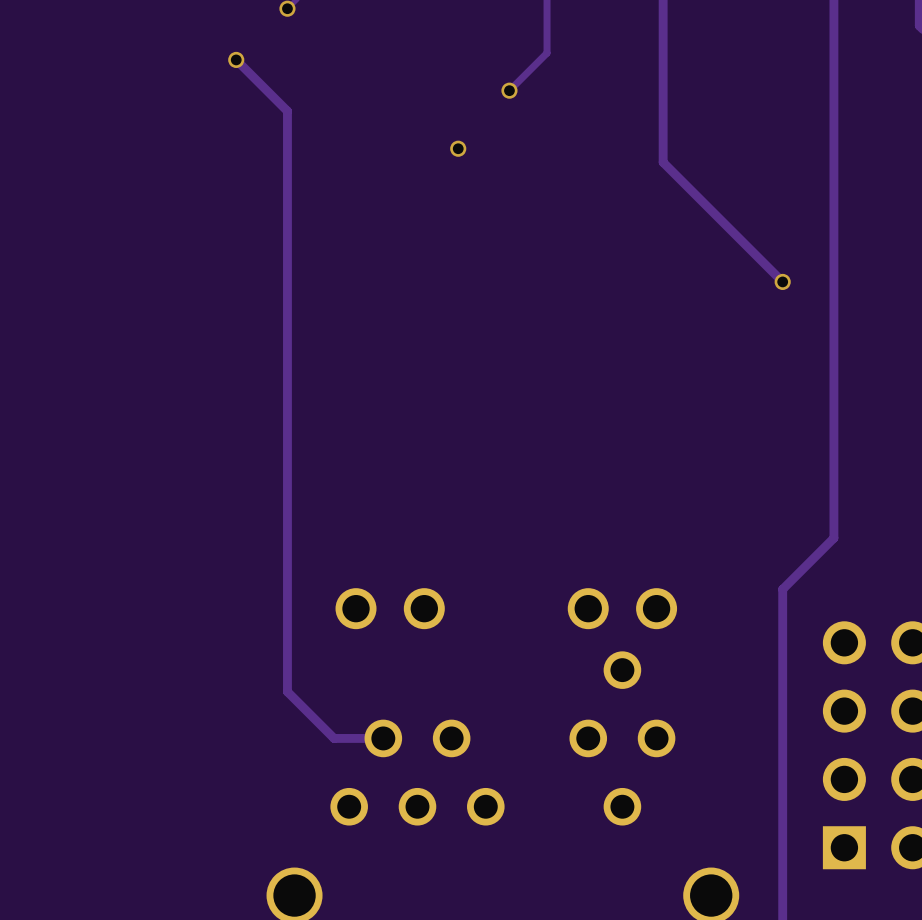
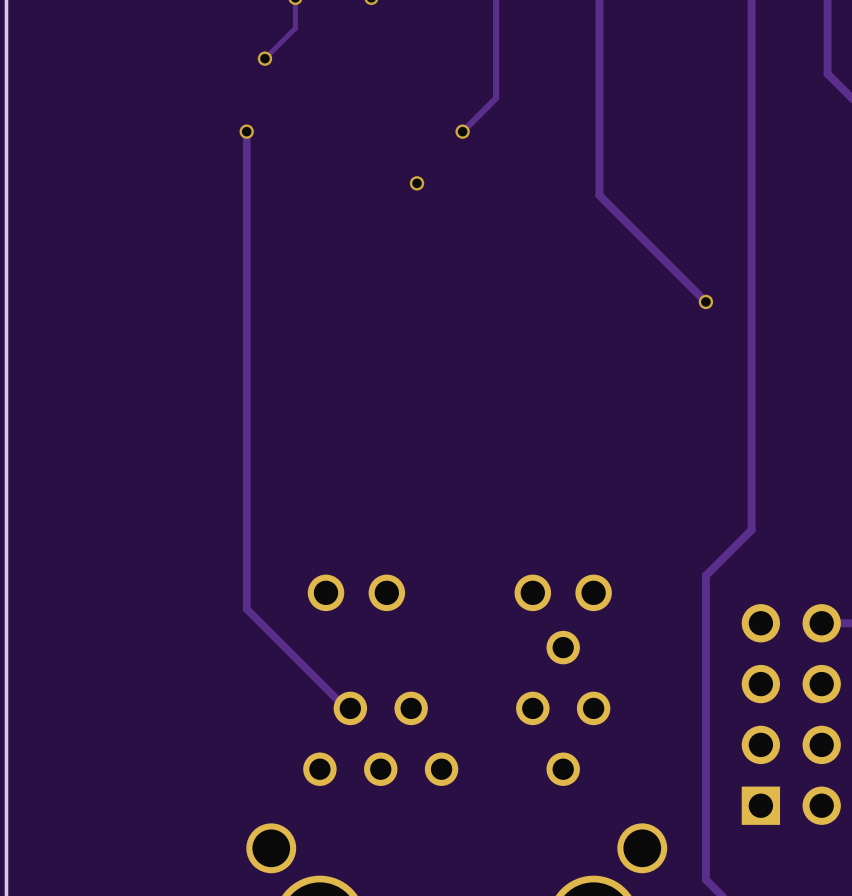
track: (236, 59) (287, 111) (287, 691) (334, 738) (378, 738) -> (246, 131) (246, 609) (346, 708)
via position: (236, 59) -> (246, 131)

